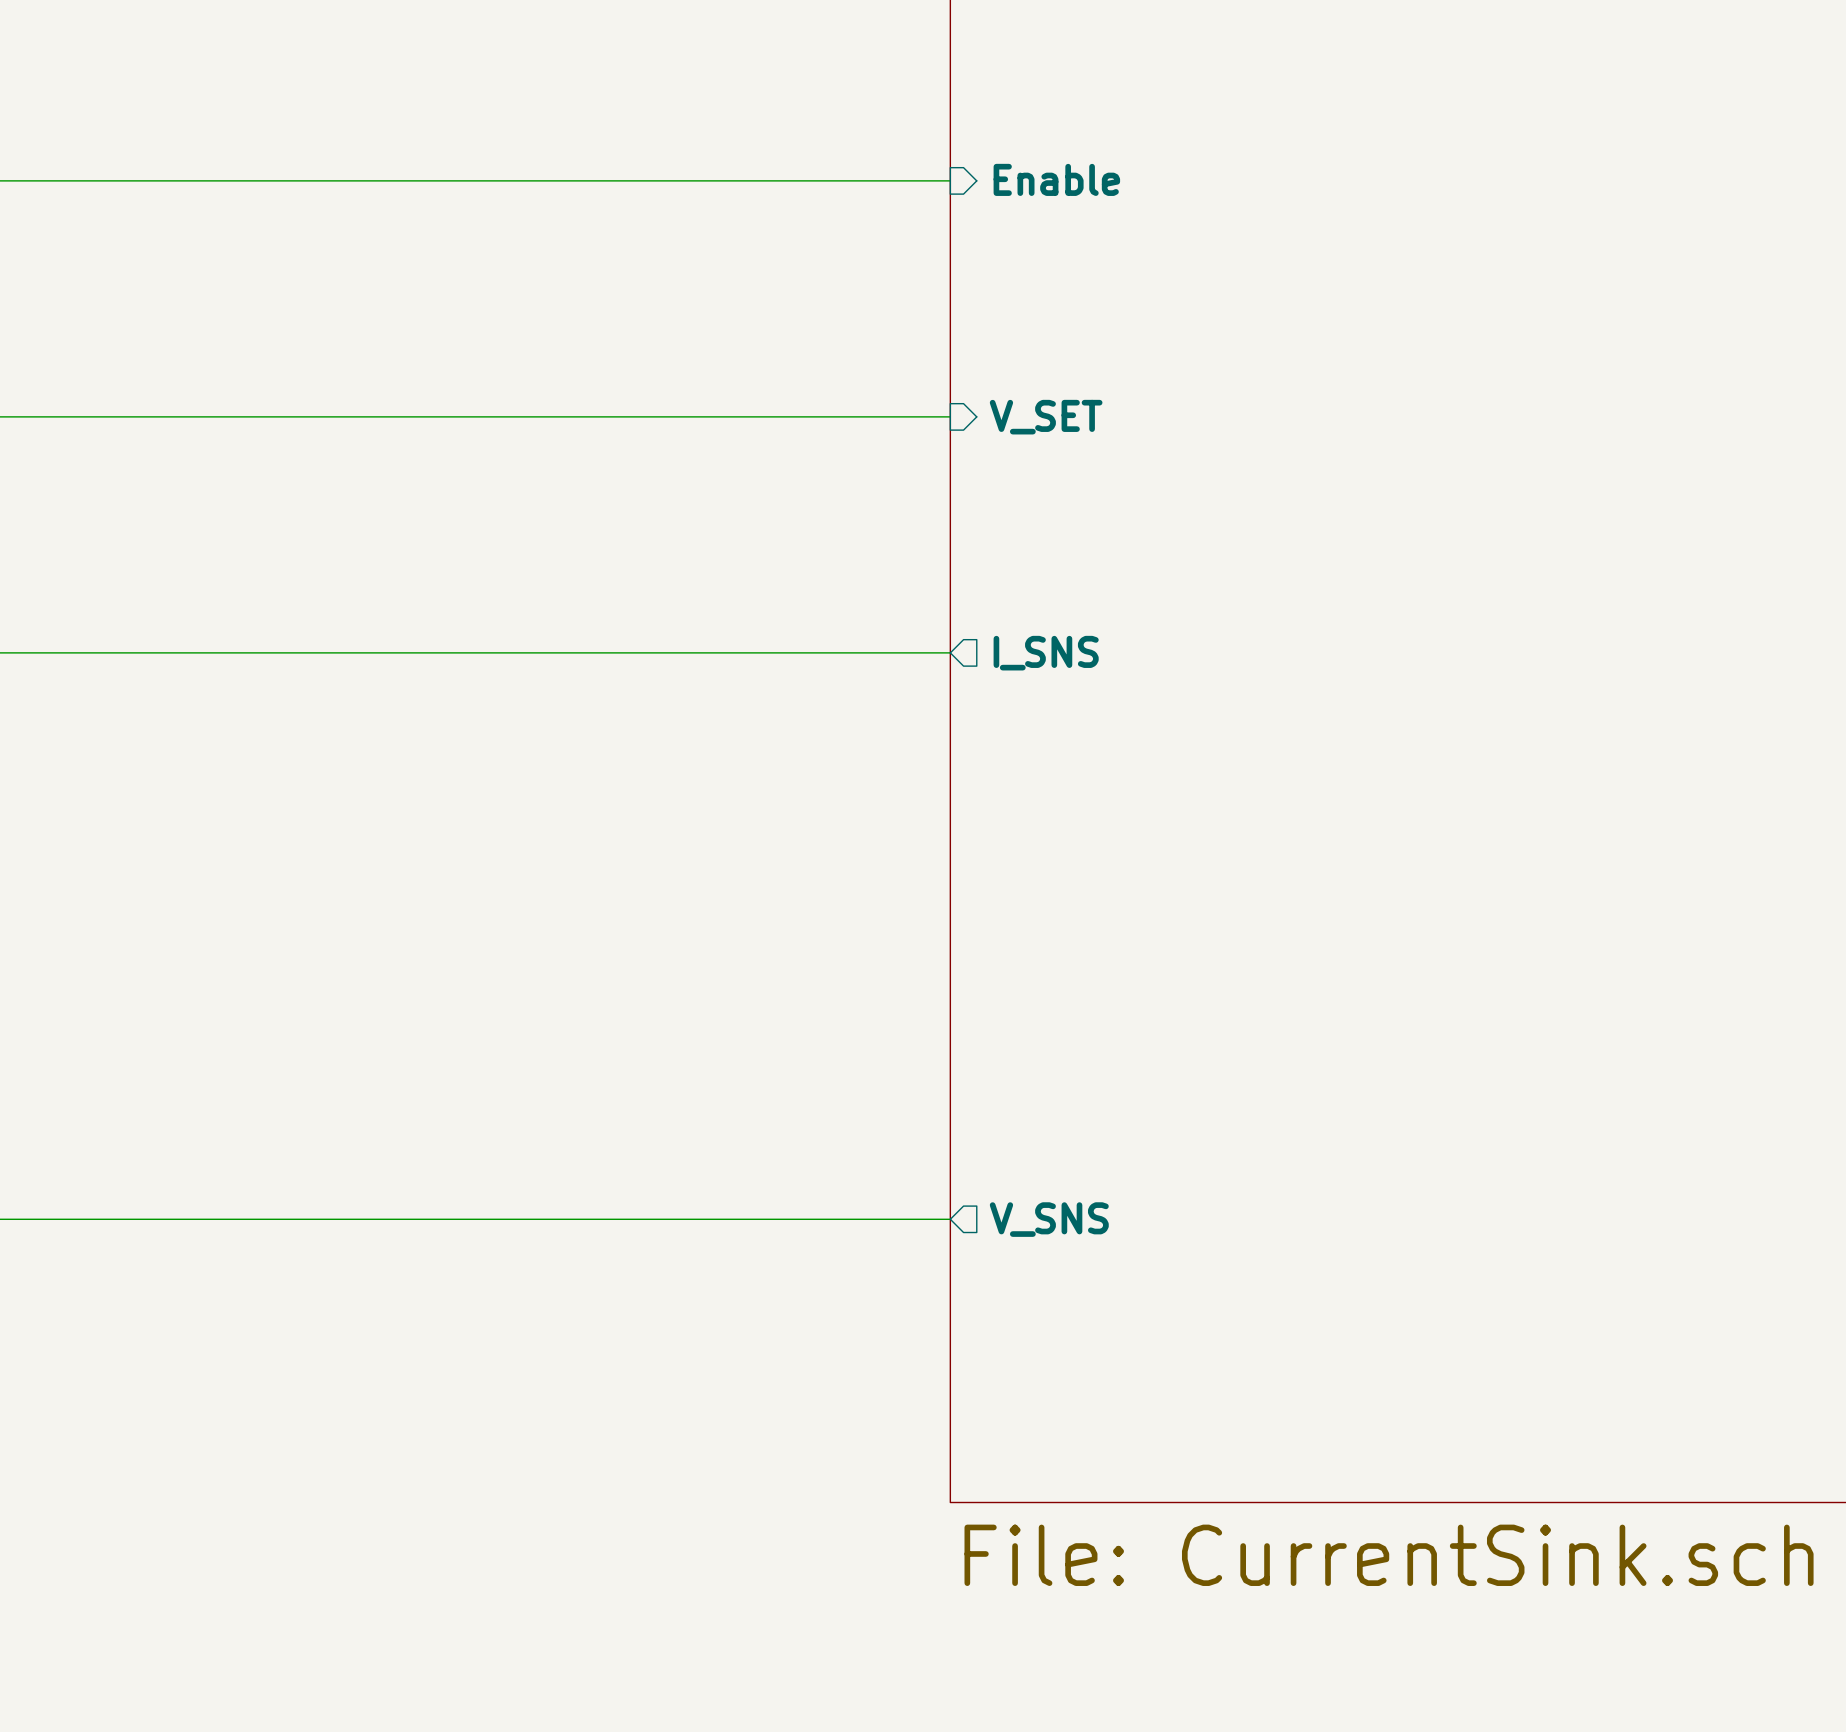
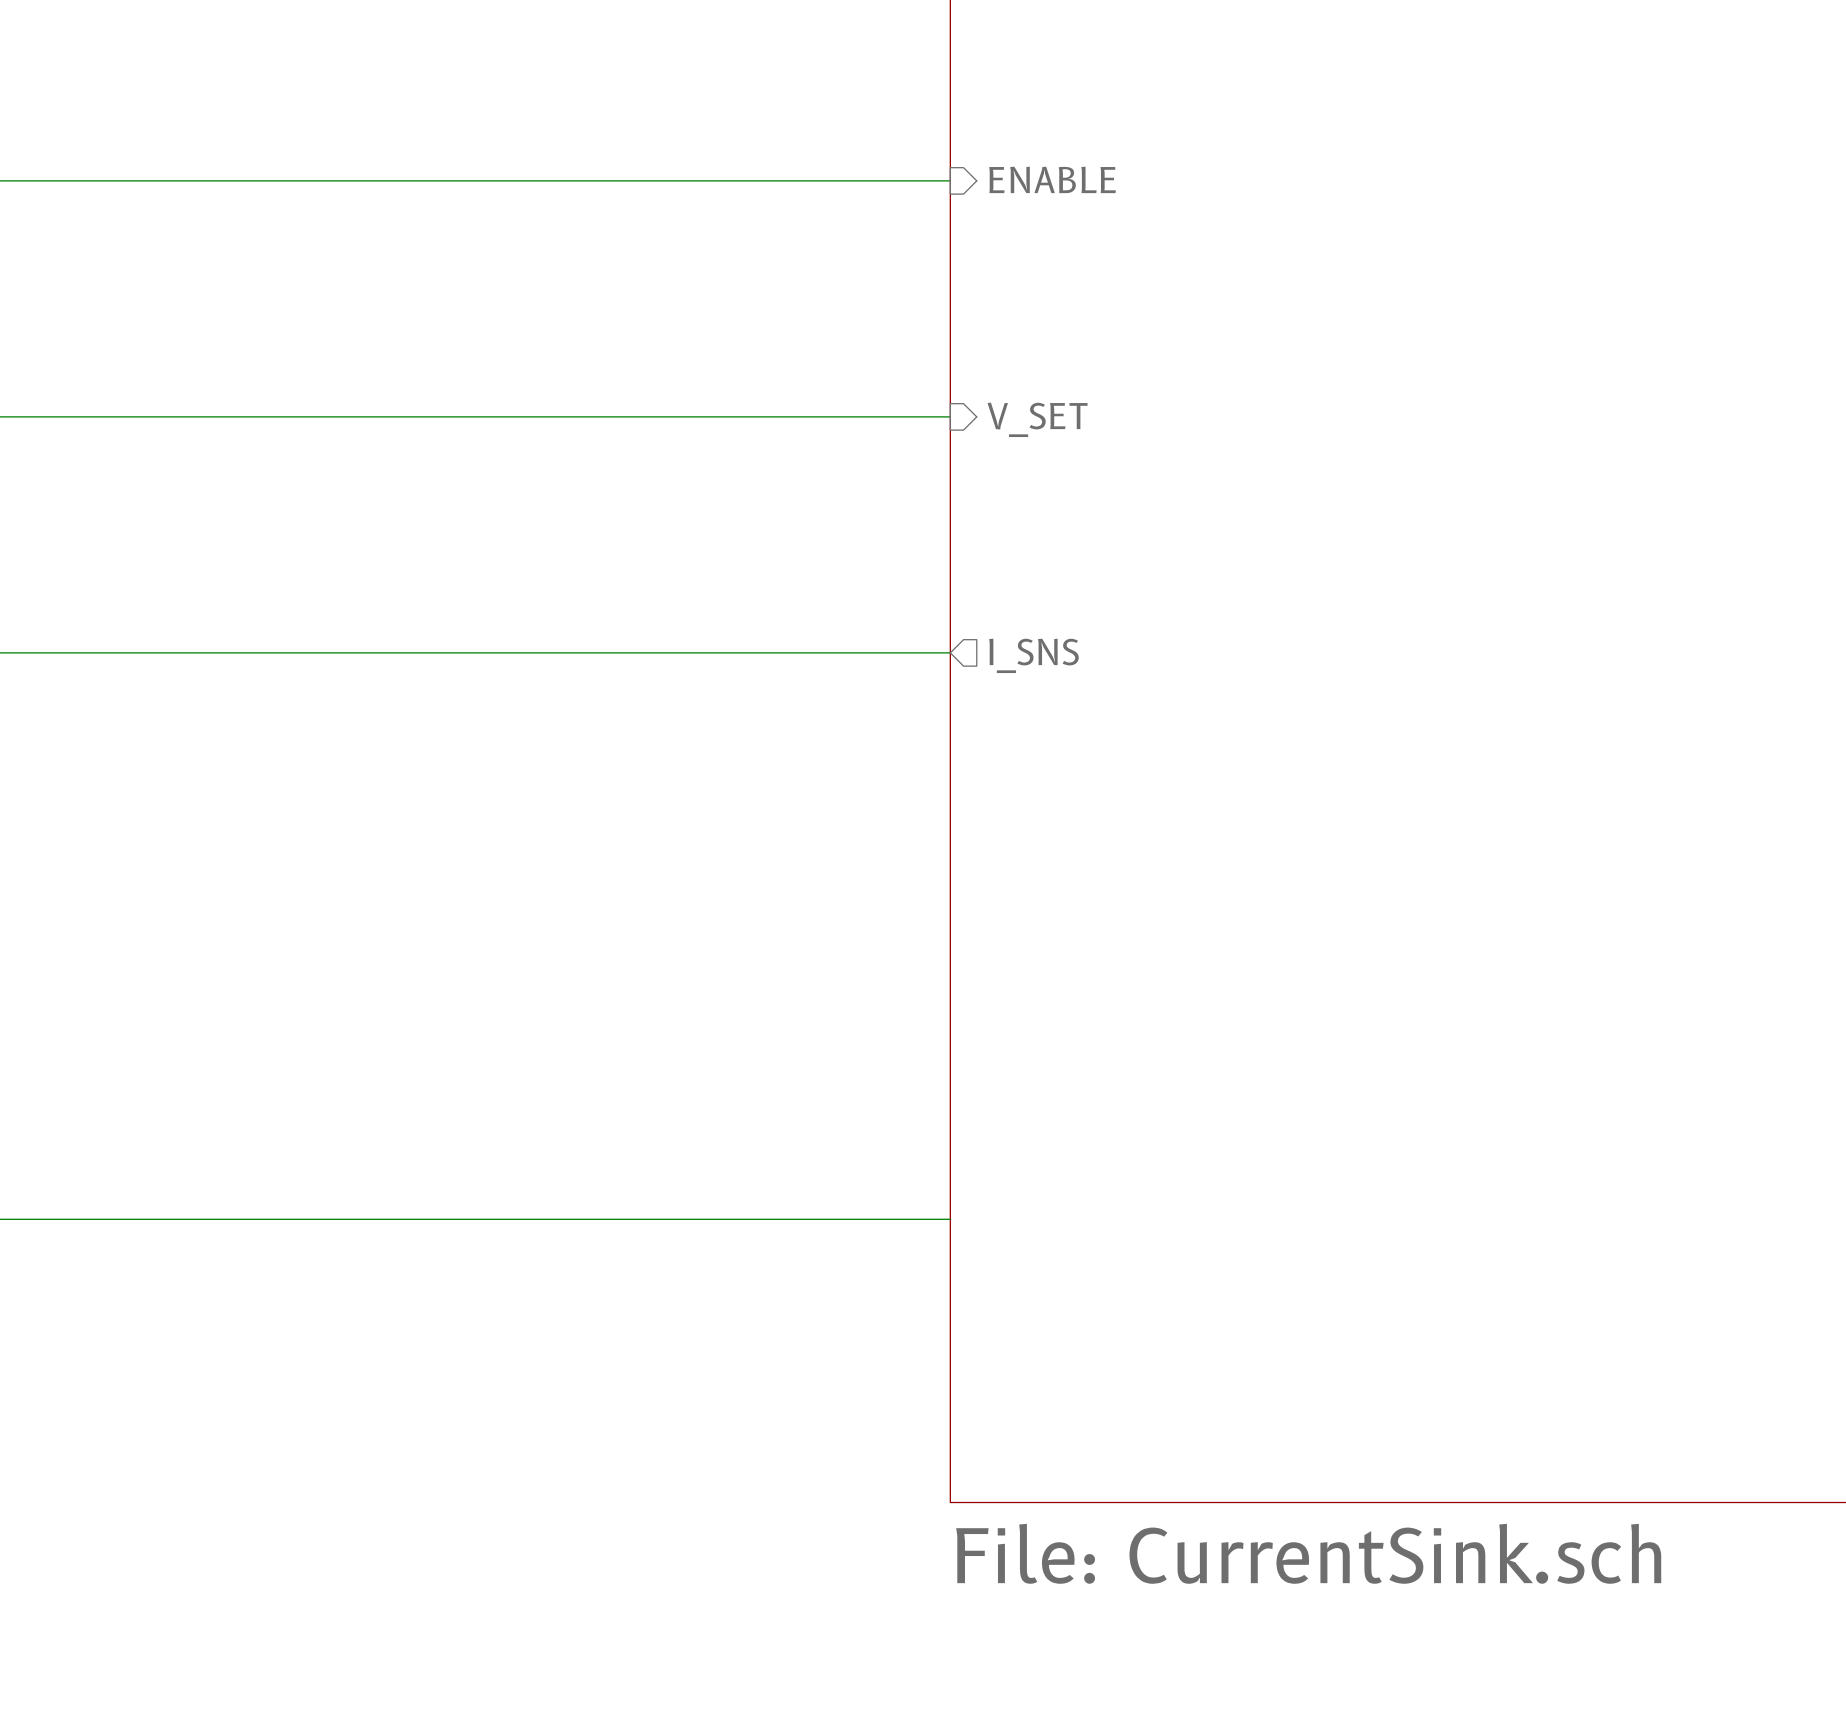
sheet pin: Enable (1056, 179) -> ENABLE (1052, 179)
sheet pin: V_SNS (1049, 1219) -> none

